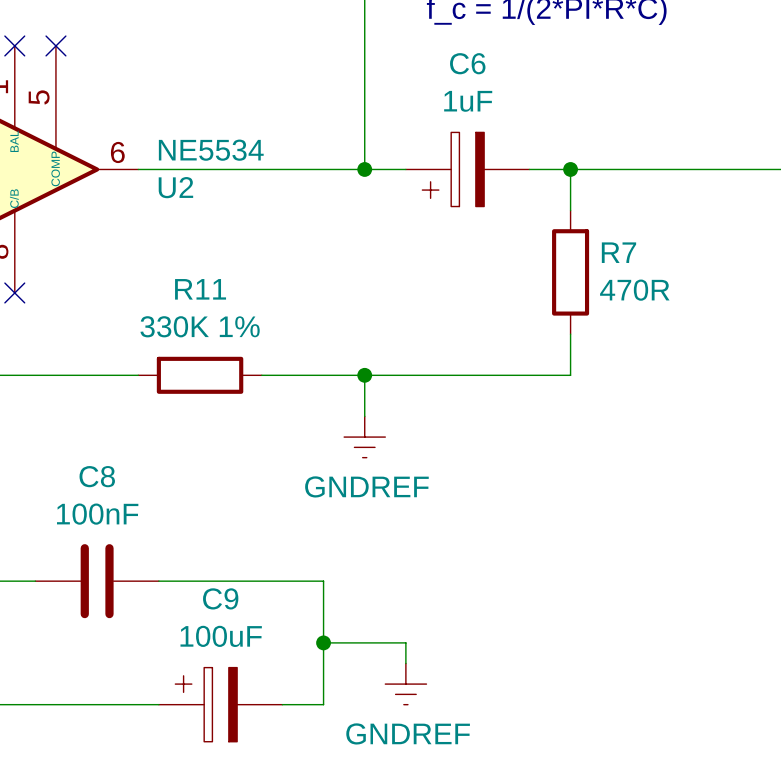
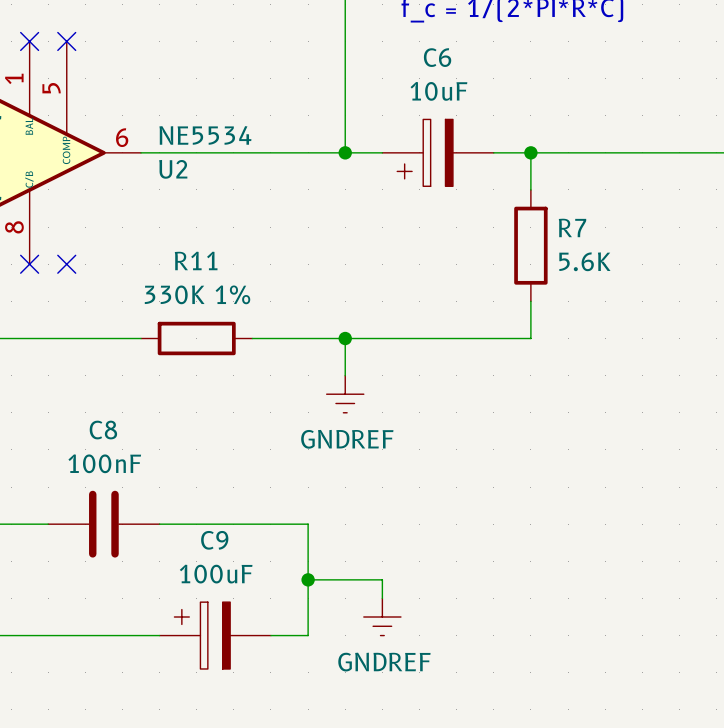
C6 value: 1uF (468, 101) -> 10uF (438, 91)
R7 value: 470R (634, 290) -> 5.6K (584, 261)
no-connect mark: none -> (66, 264)

